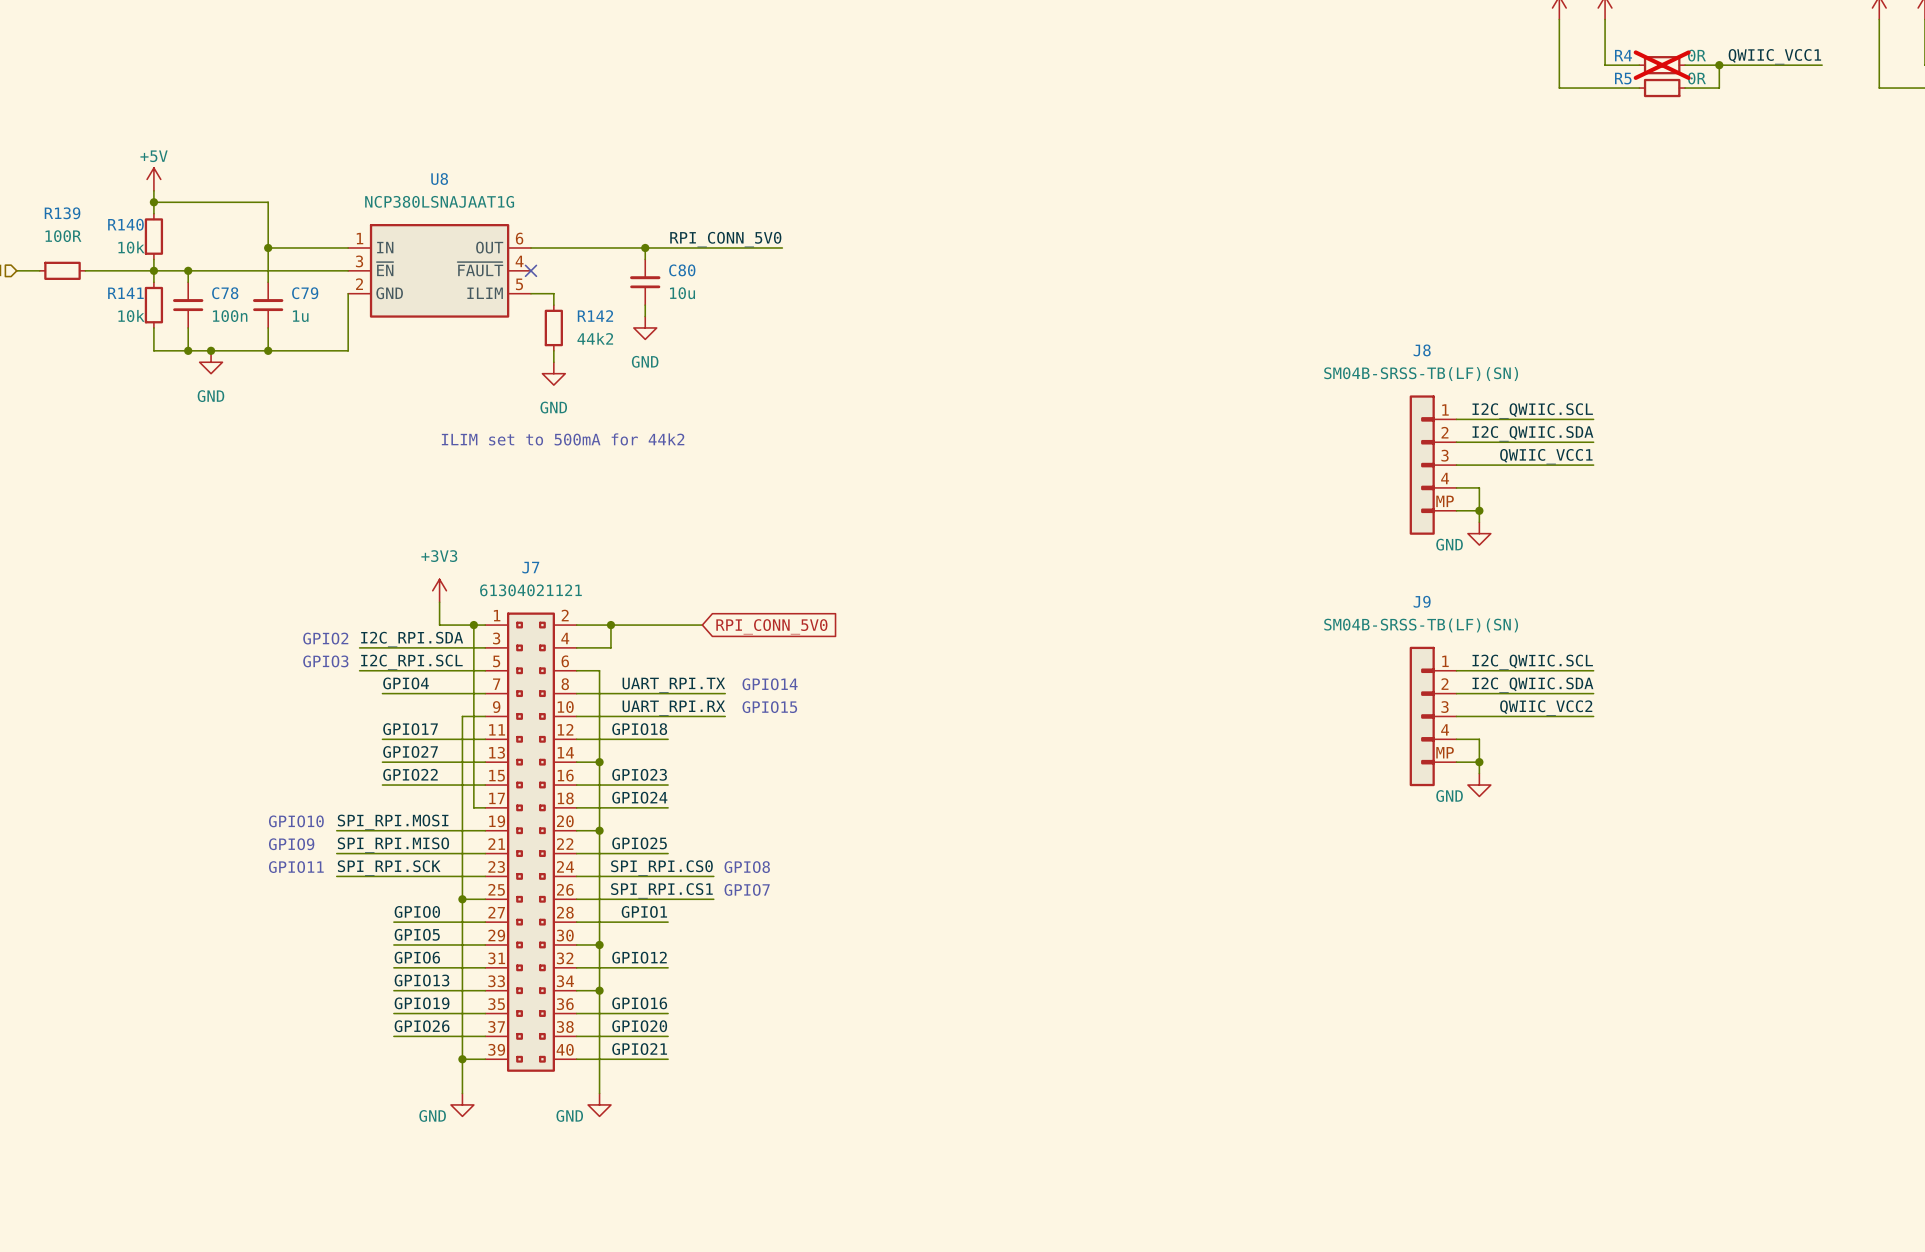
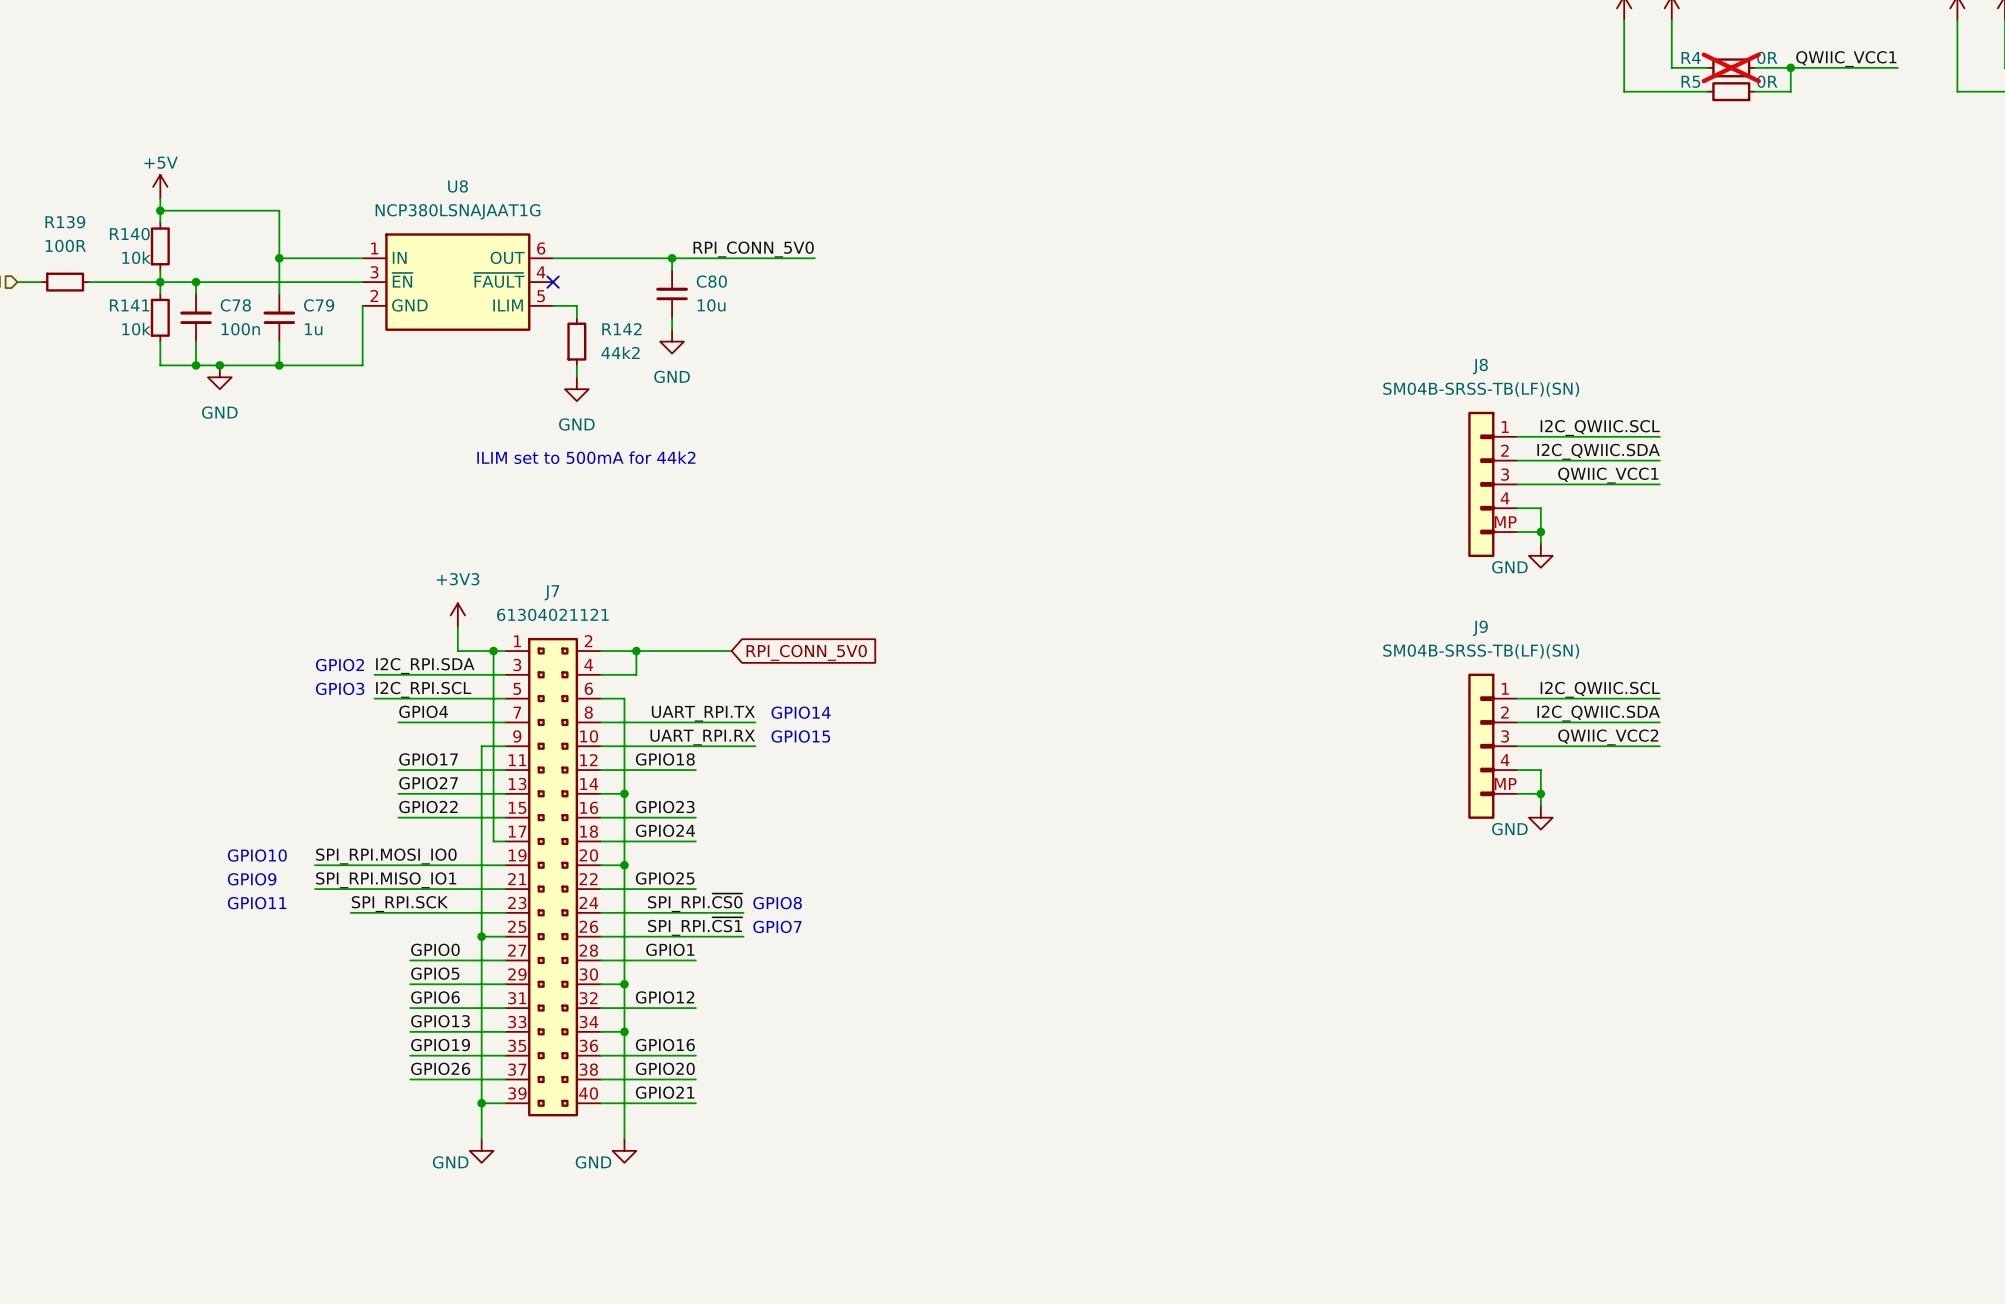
text position: GPIO10 (296, 821) -> GPIO10 (257, 855)
label: none -> SPI_RPI.MOSI_IO0 (386, 856)
label: SPI_RPI.MOSI (393, 822) -> none
wire: none -> (315, 865) (350, 865)
text position: GPIO9 (291, 844) -> GPIO9 (252, 879)
label: none -> SPI_RPI.MISO_IO1 (386, 880)
label: SPI_RPI.MISO (393, 845) -> none
wire: none -> (315, 889) (350, 889)
text position: GPIO11 (296, 867) -> GPIO11 (257, 903)
label: SPI_RPI.CS0 (661, 867) -> SPI_RPI.~{CS0} (695, 902)
label: SPI_RPI.CS1 (661, 890) -> SPI_RPI.~{CS1} (695, 926)

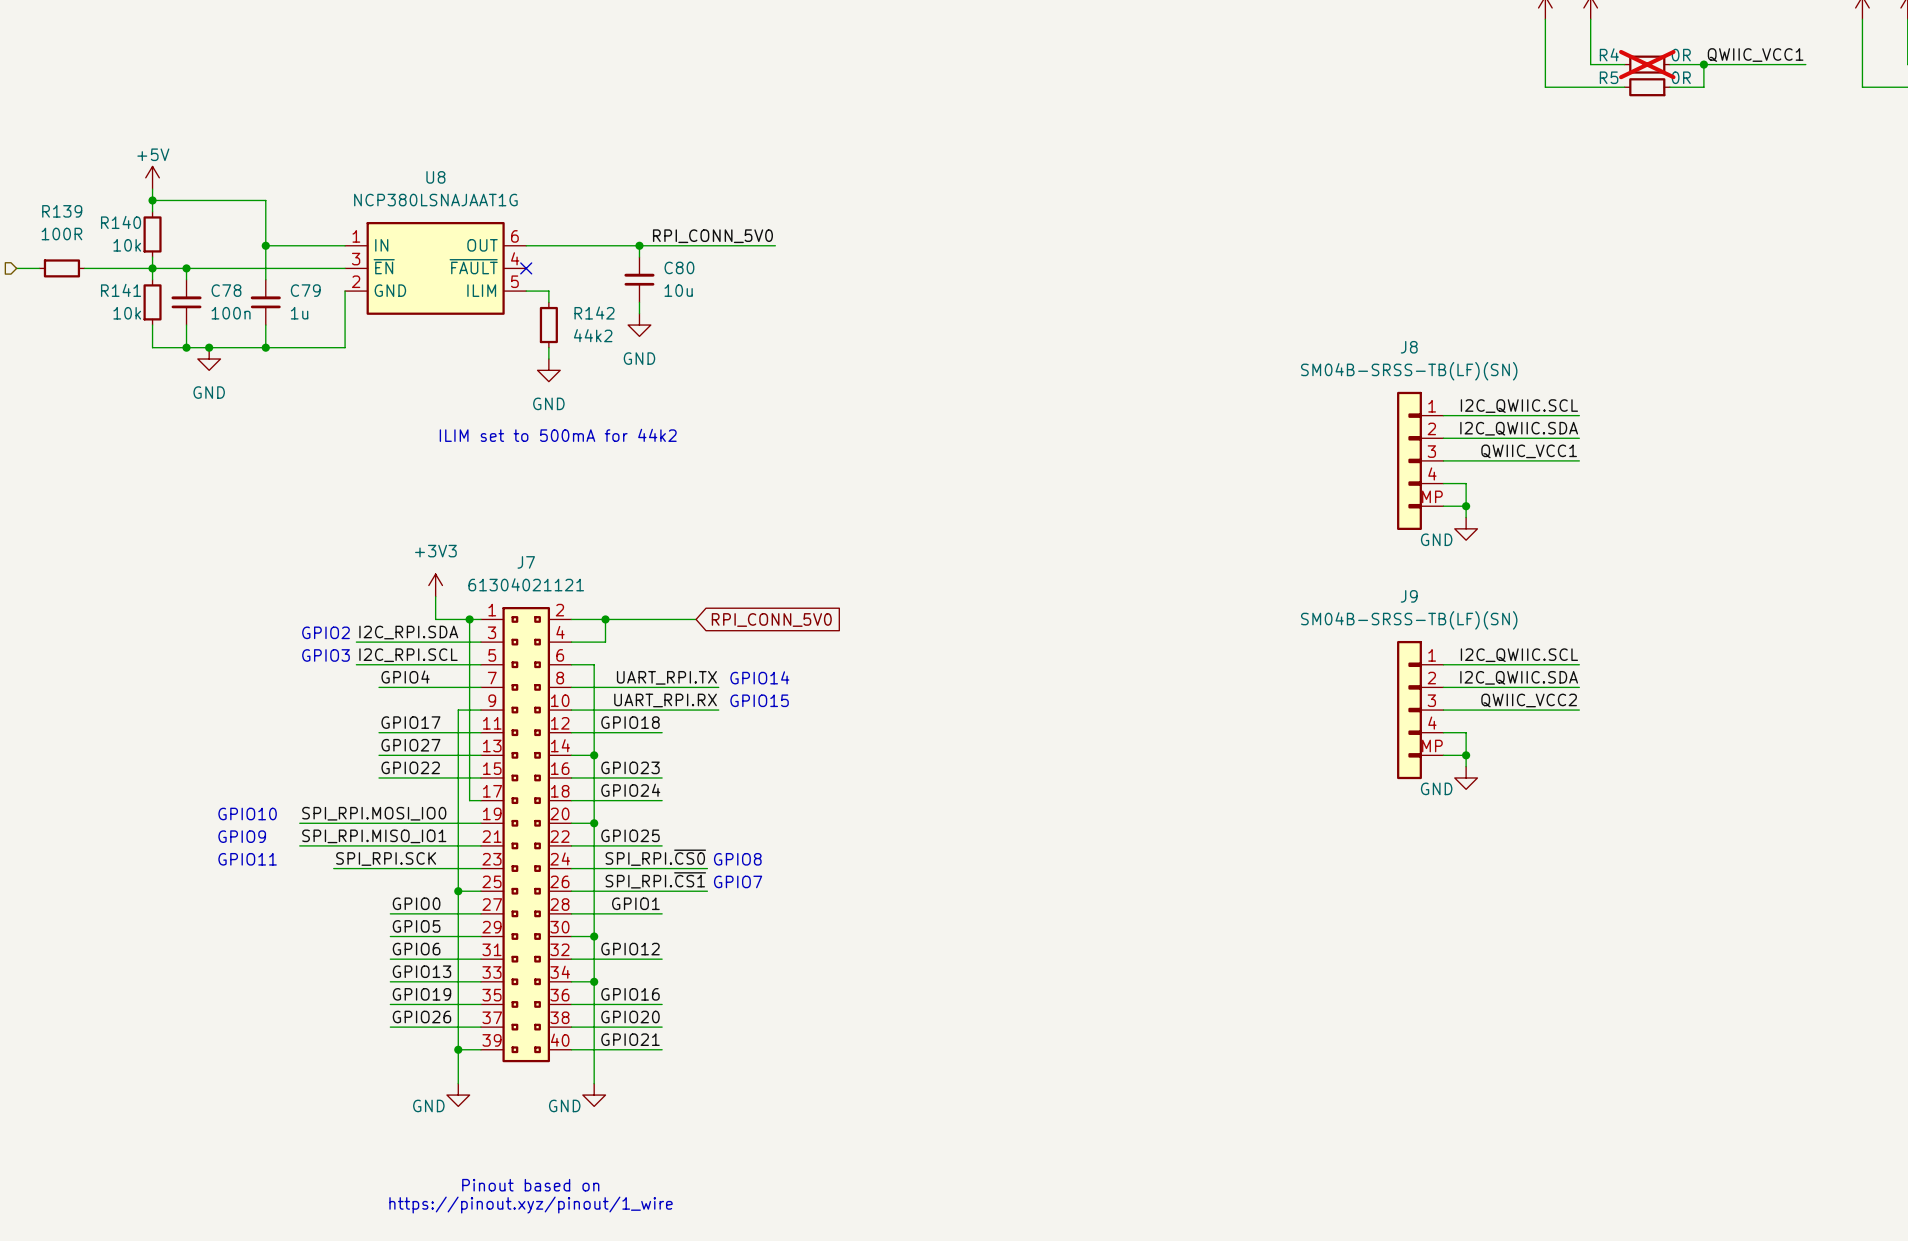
text: none -> Pinout based on (530, 1185)
text: none -> https://pinout.xyz/pinout/1_wire (531, 1205)

